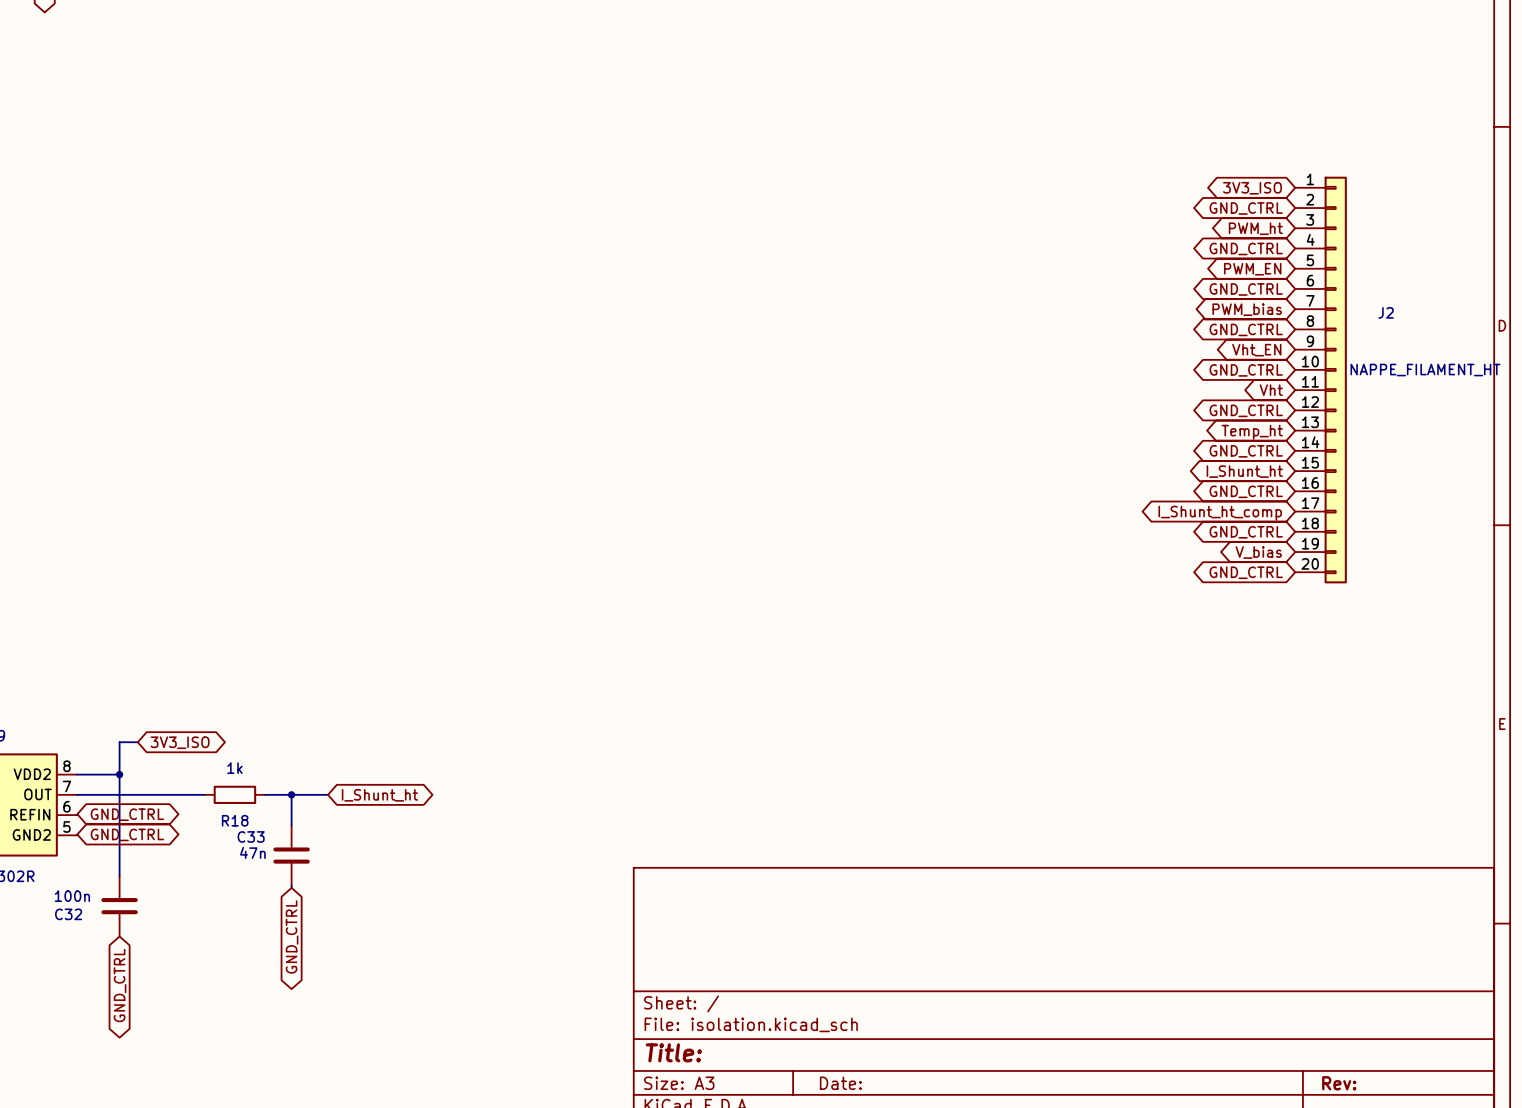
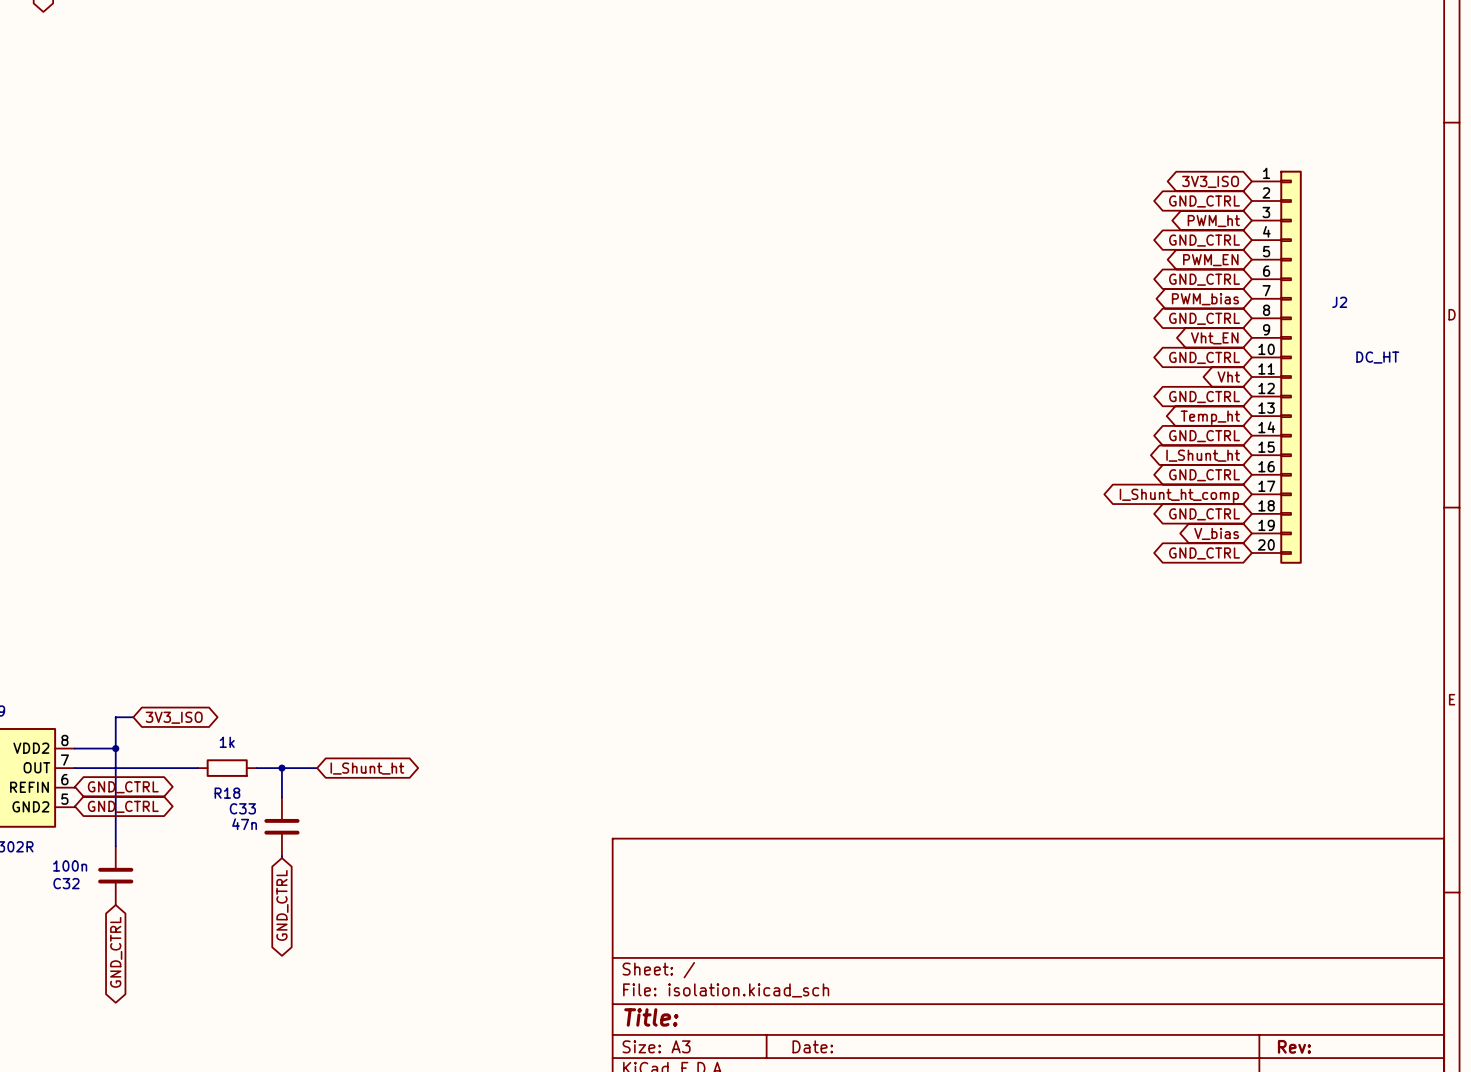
J2 value: NAPPE_FILAMENT_HT (1425, 370) -> DC_HT (1377, 357)

